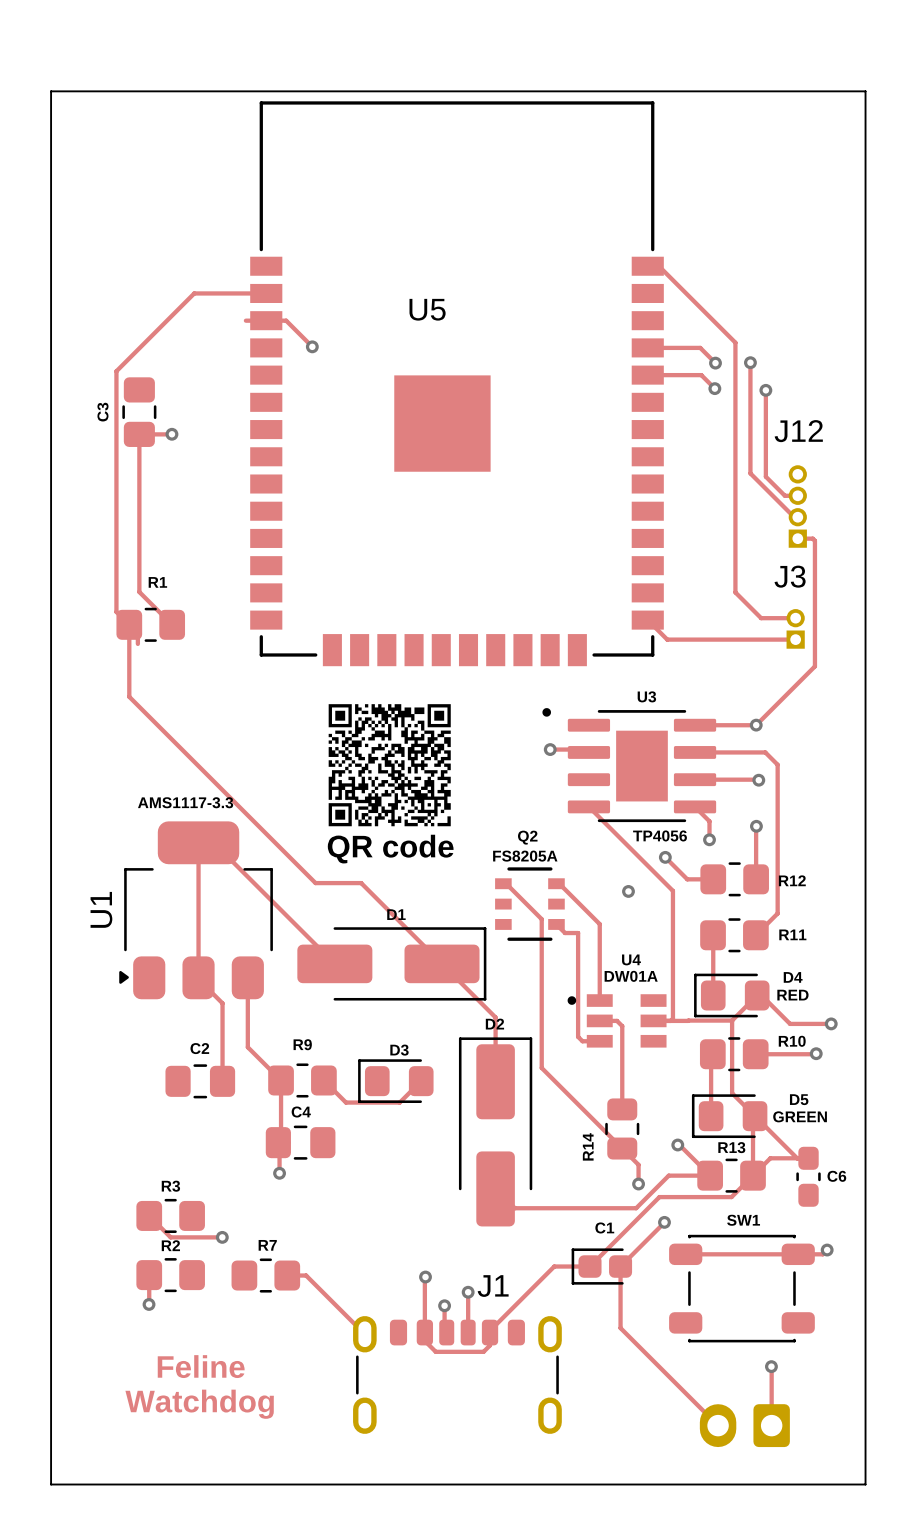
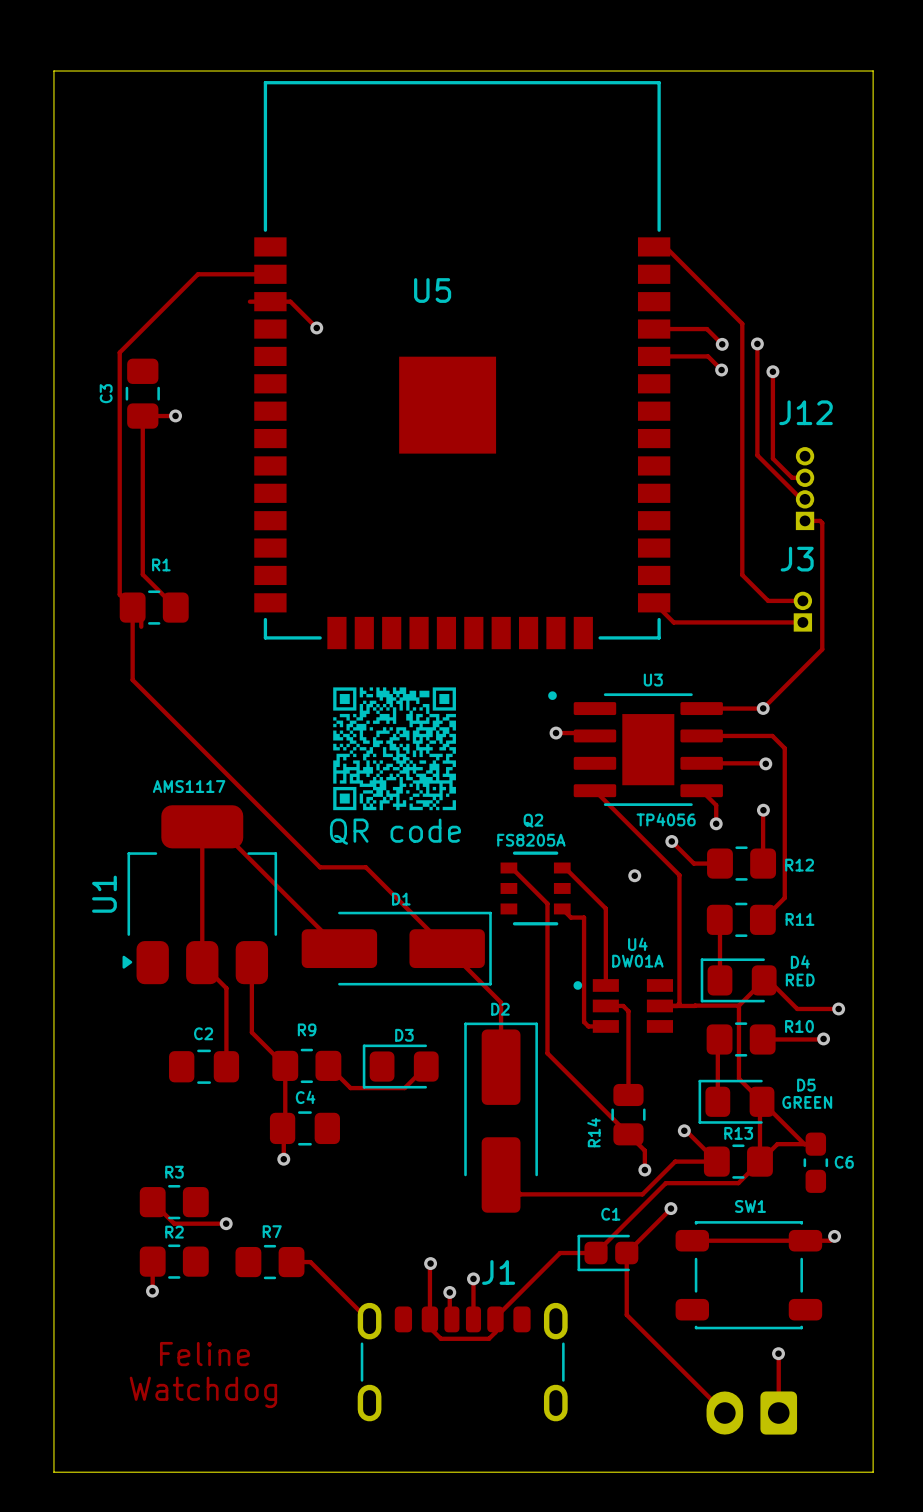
U1 value: AMS1117-3.3 (185, 802) -> AMS1117 (189, 786)

